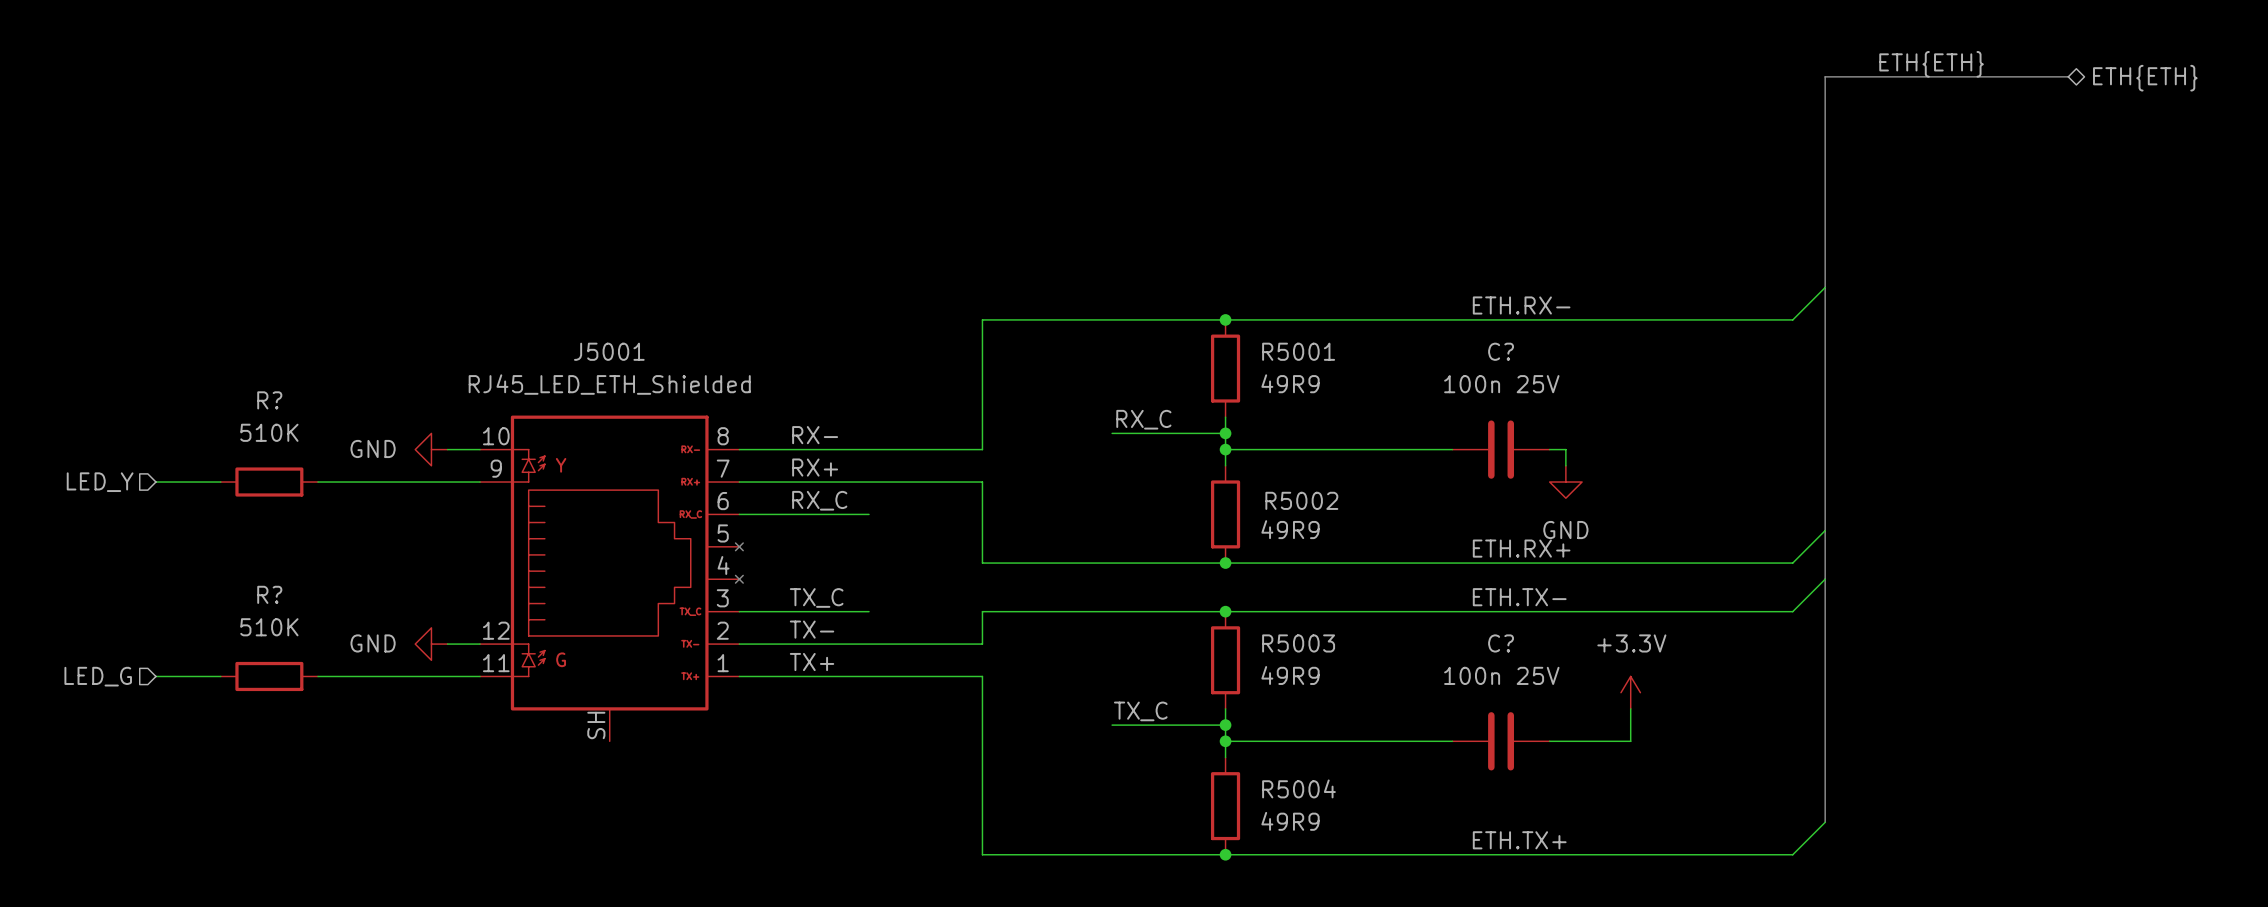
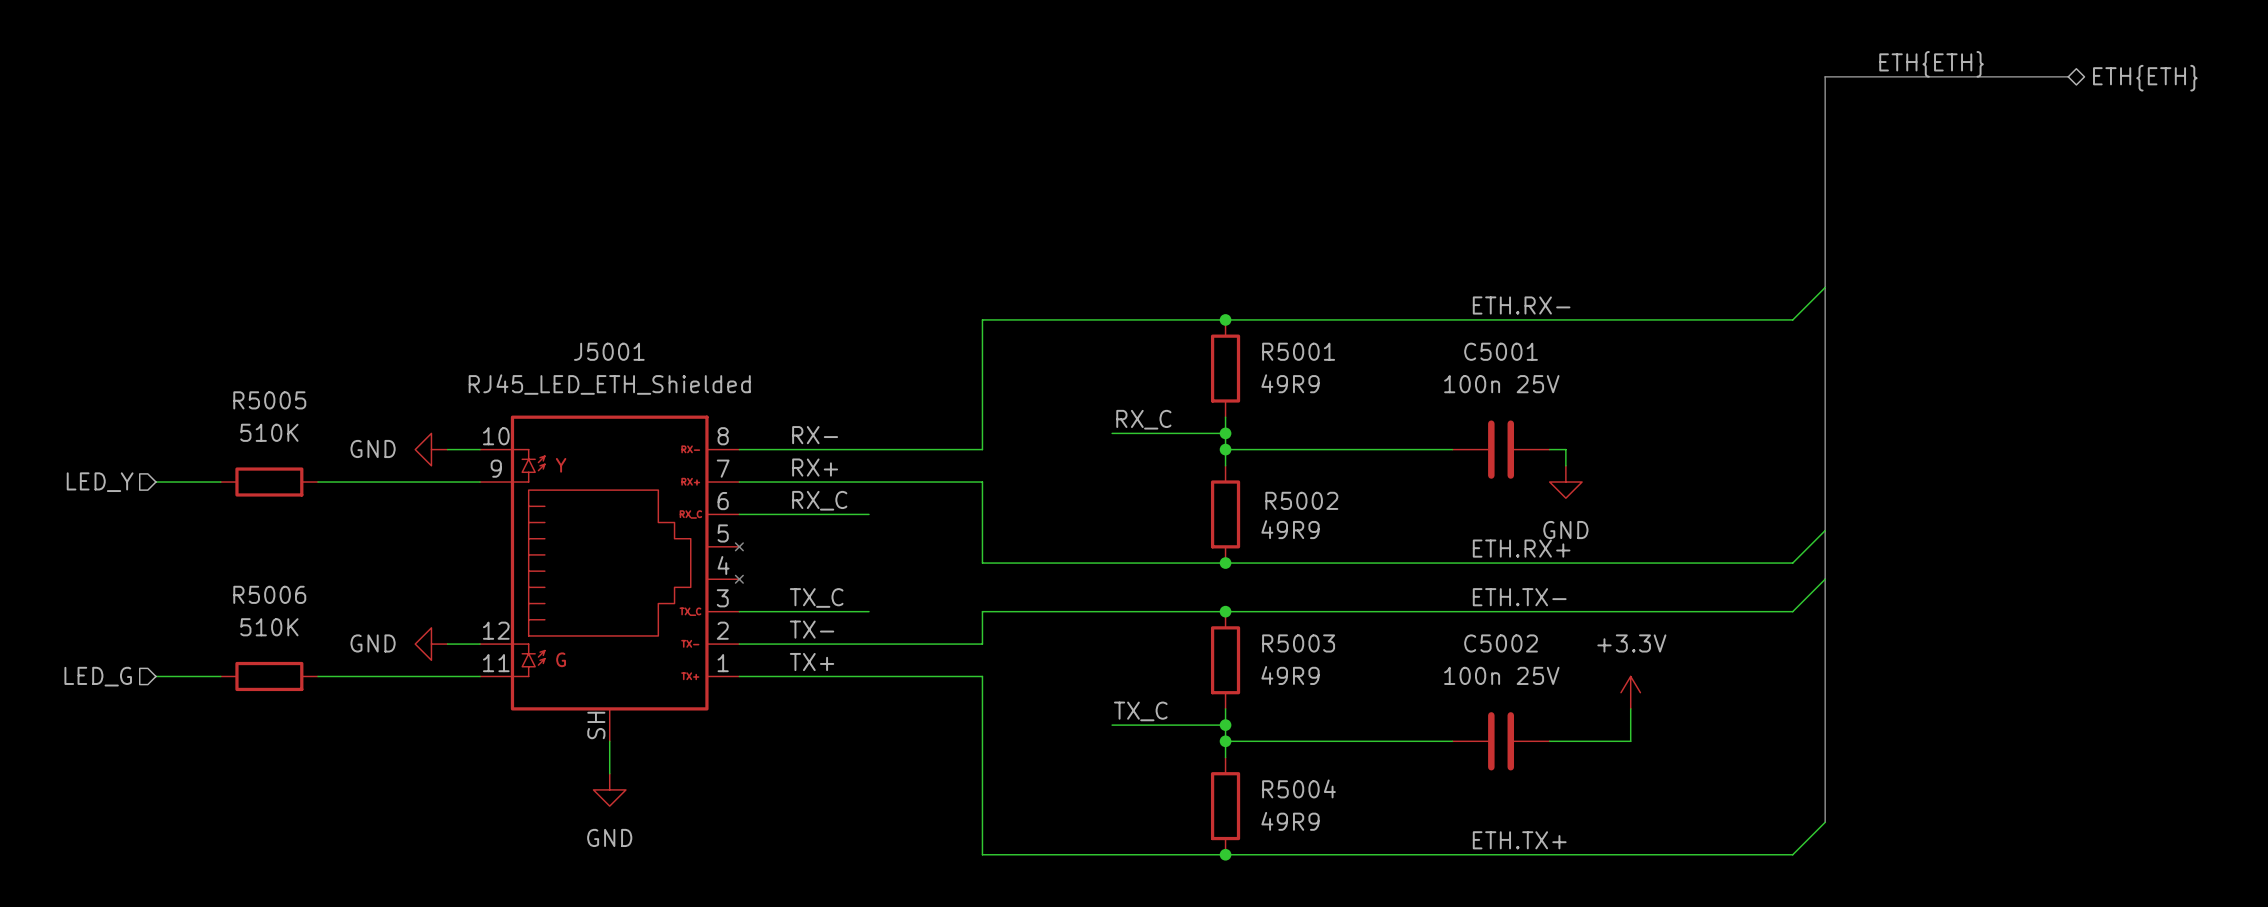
C? name: C? (1501, 351) -> C5001 (1501, 351)
R? name: R? (269, 400) -> R5005 (269, 400)
R? name: R? (269, 594) -> R5006 (269, 594)
C? name: C? (1501, 643) -> C5002 (1501, 643)
wire: none -> (609, 741) (609, 773)
power symbol: none -> GND (609, 789)

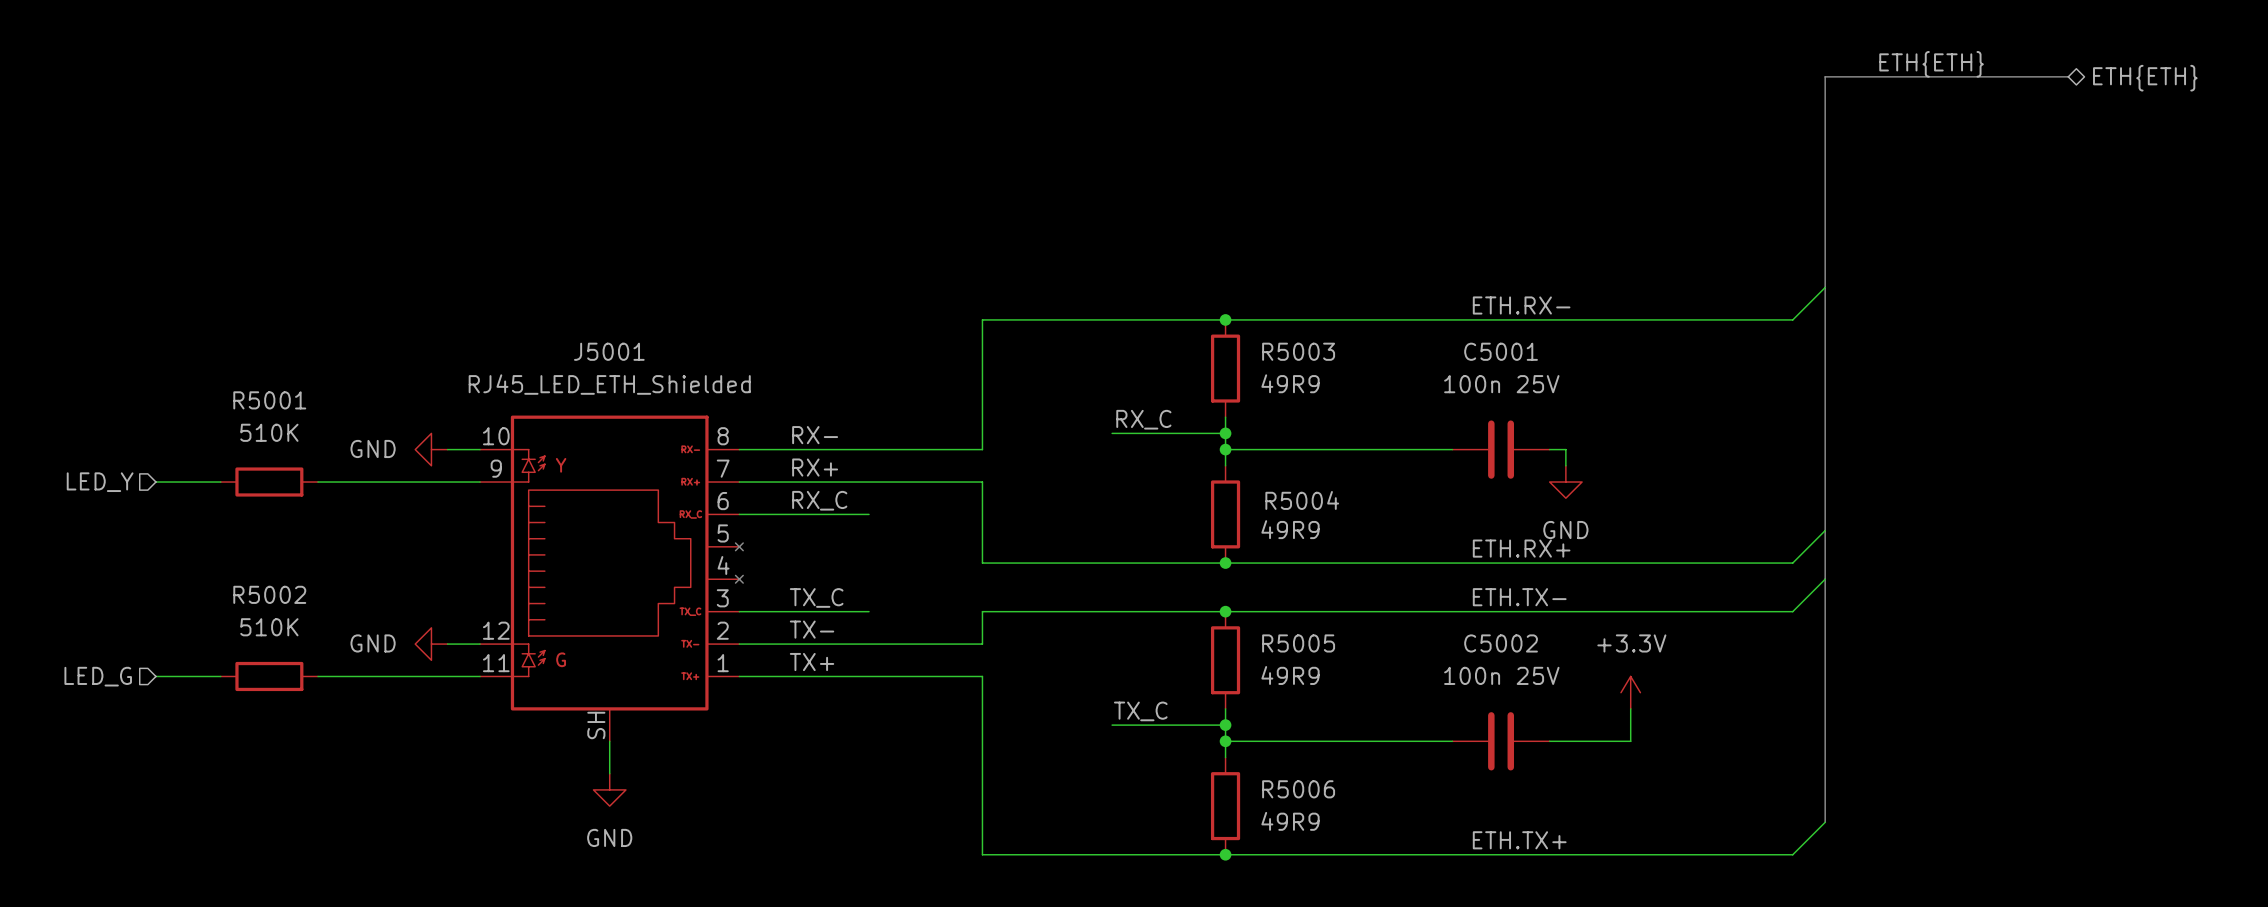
R5001 name: R5001 (1298, 351) -> R5003 (1298, 351)
R5005 name: R5005 (269, 400) -> R5001 (269, 400)
R5002 name: R5002 (1301, 500) -> R5004 (1302, 500)
R5006 name: R5006 (269, 594) -> R5002 (269, 594)
R5003 name: R5003 (1298, 643) -> R5005 (1298, 643)
R5004 name: R5004 (1298, 788) -> R5006 (1298, 789)

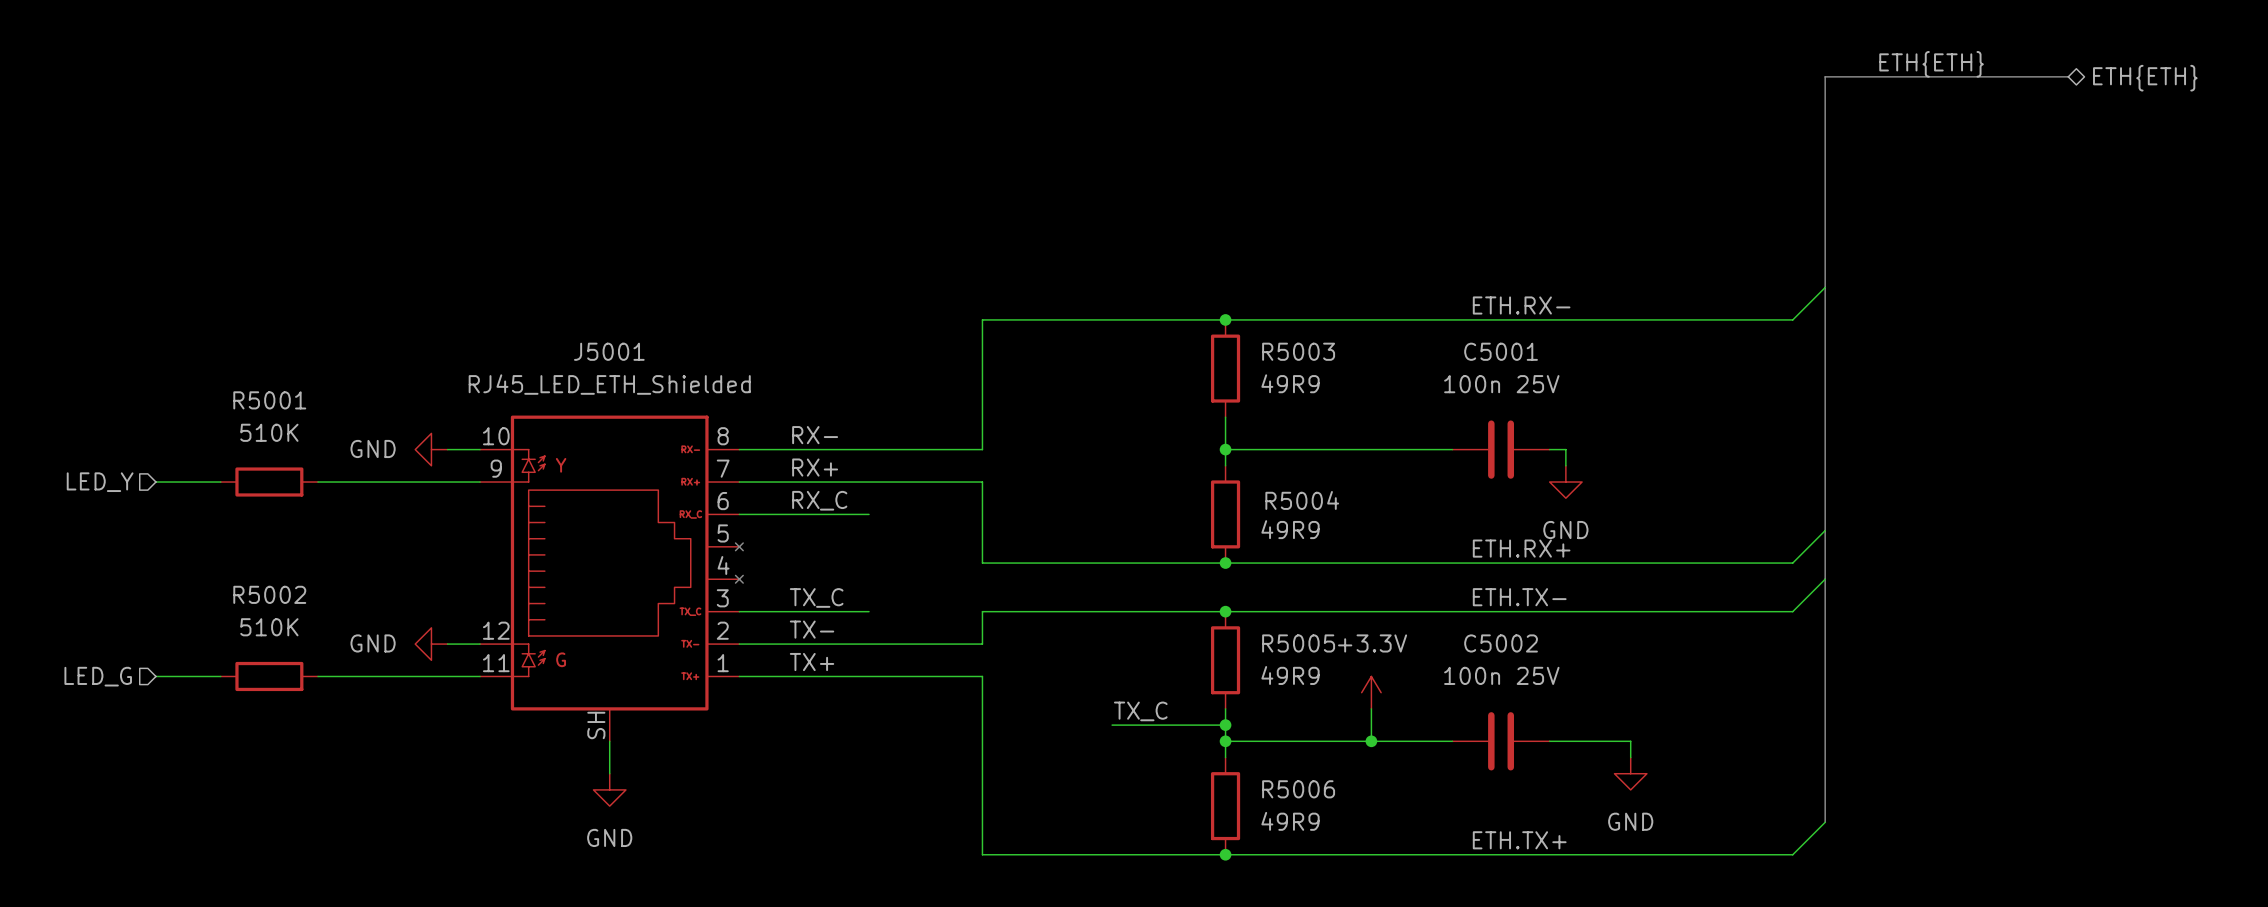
label: RX_C (1143, 419) -> none
wire: (1112, 433) (1225, 433) -> none
junction: (1225, 433) -> none
power symbol position: +3.3V (1630, 692) -> +3.3V (1371, 692)
wire: none -> (1371, 708) (1371, 741)
wire: (1630, 708) (1630, 741) -> (1630, 757) (1630, 741)
junction: none -> (1371, 741)
power symbol: none -> GND (1630, 773)

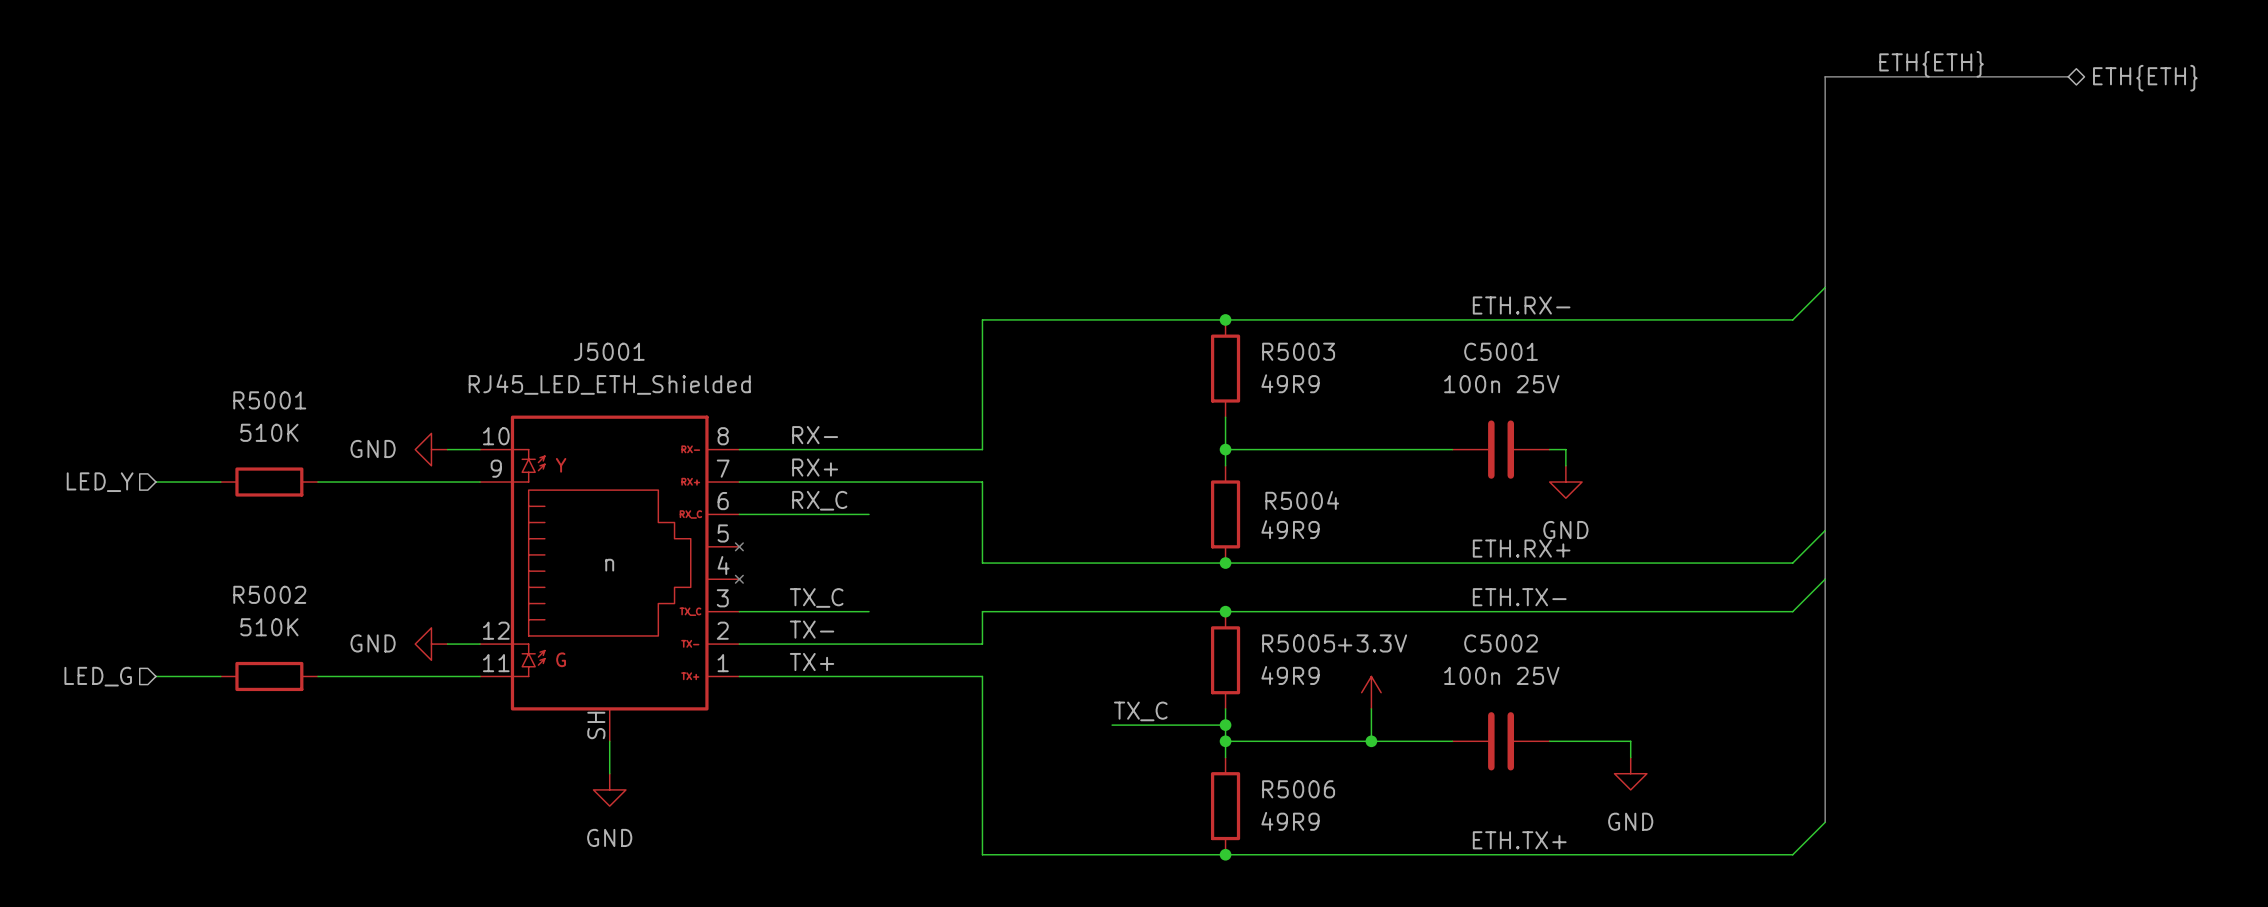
J5001 text: none -> n (609, 565)

